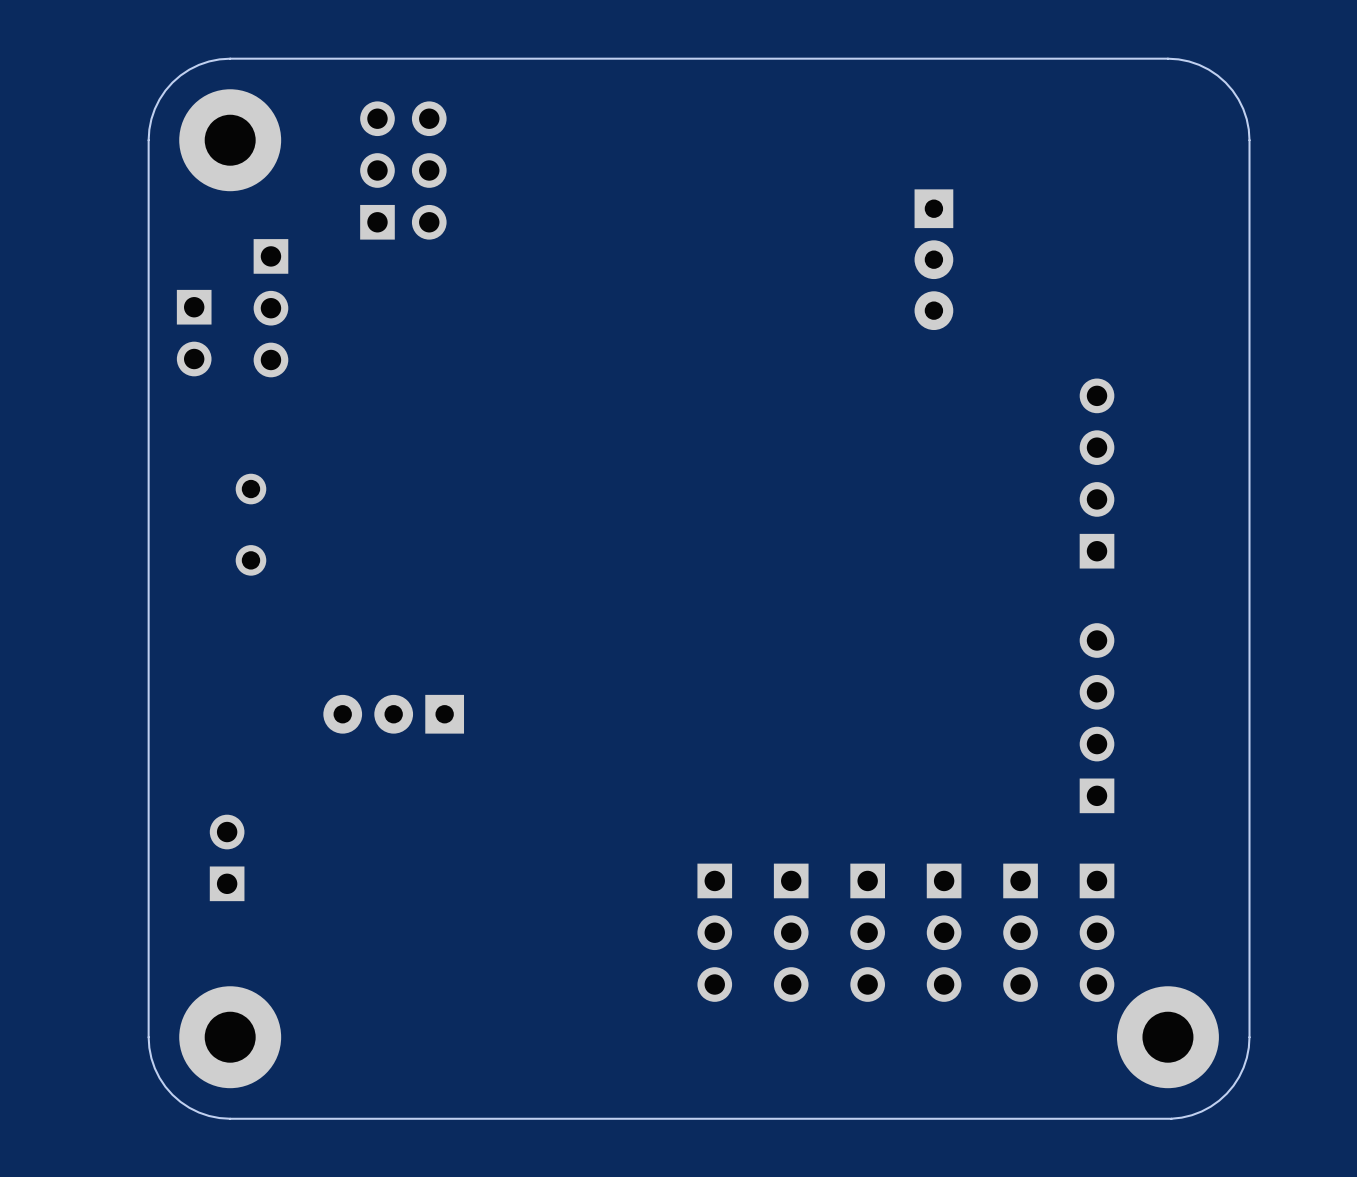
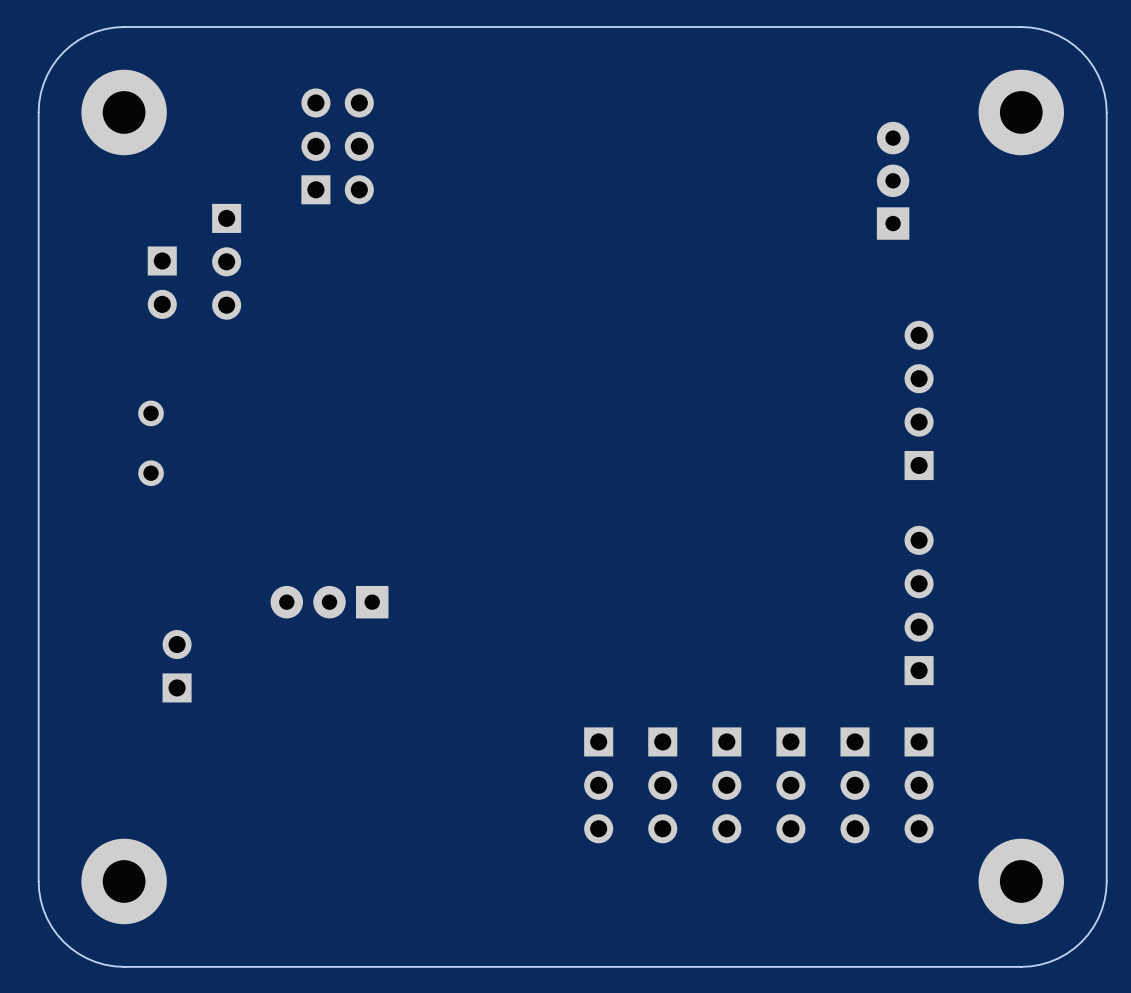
board edge: (1167, 58) (230, 58) (198, 64) (172, 82) (154, 109) (148, 140) (148, 1037) (154, 1068) (172, 1094) (198, 1112) (230, 1118) (1171, 1118) (1201, 1111) (1226, 1093) (1243, 1067) (1249, 1037) (1249, 140) (1243, 109) (1225, 82) (1199, 64) (1167, 58) -> (1021, 27) (1040, 29) (1058, 35) (1081, 52) (1098, 75) (1106, 102) (1106, 881) (1101, 909) (1093, 926) (1081, 941) (1066, 953) (1049, 962) (1021, 966) (124, 966) (95, 962) (78, 953) (63, 941) (51, 926) (43, 909) (38, 881) (38, 112) (43, 84) (51, 67) (63, 52) (78, 40) (95, 31) (124, 27) (1021, 27)
part: none -> (1021, 112)
part position: (230, 140) -> (124, 112)
part rotation: 0° (933, 259) -> 180° (893, 180)
part position: (933, 259) -> (893, 180)
part position: (250, 524) -> (151, 443)
part position: (227, 857) -> (177, 666)
part position: (230, 1037) -> (124, 881)
part position: (1167, 1037) -> (1021, 881)

